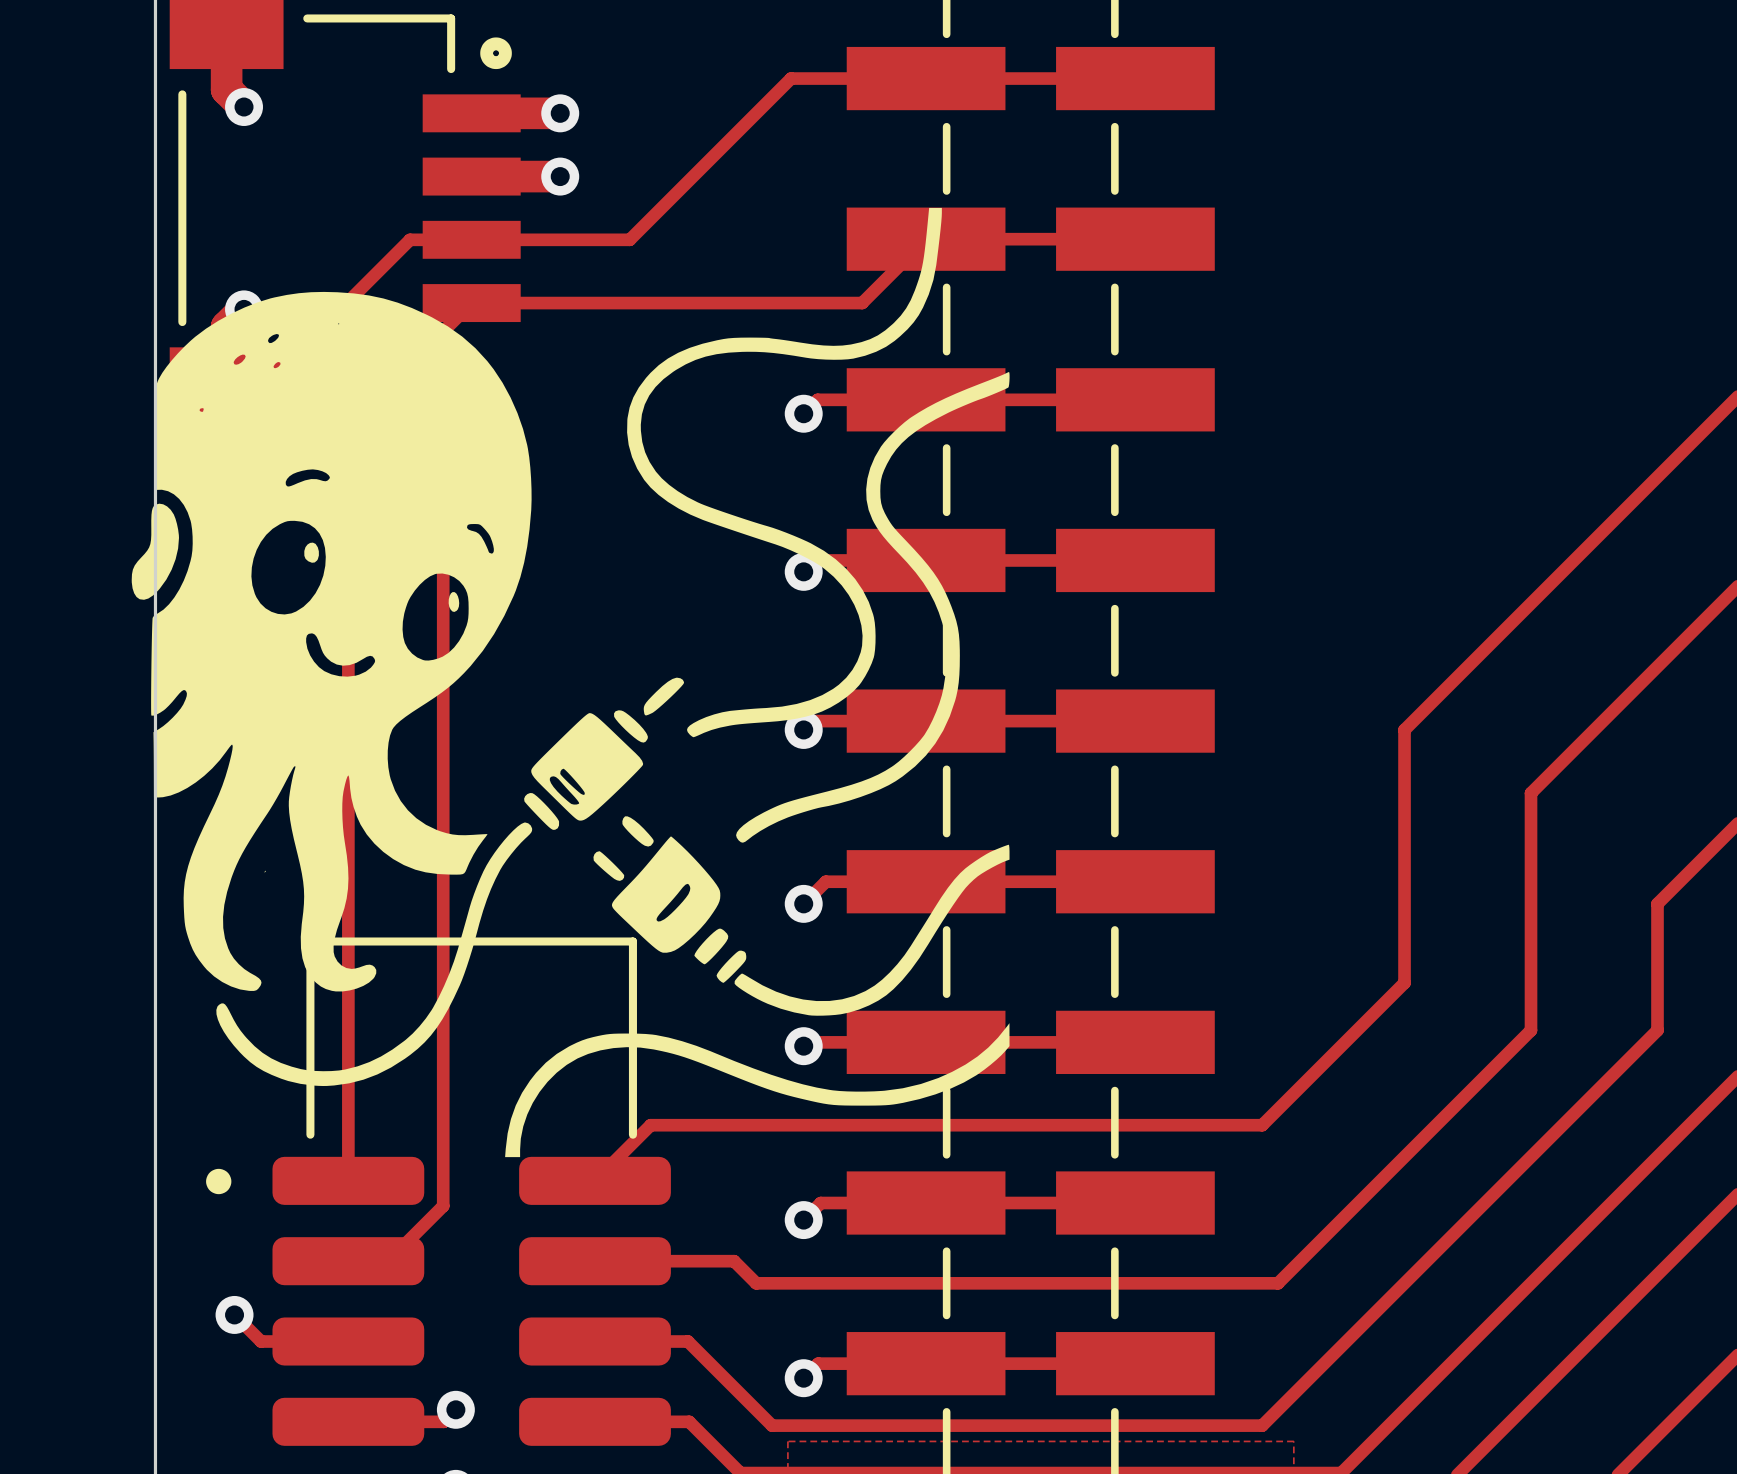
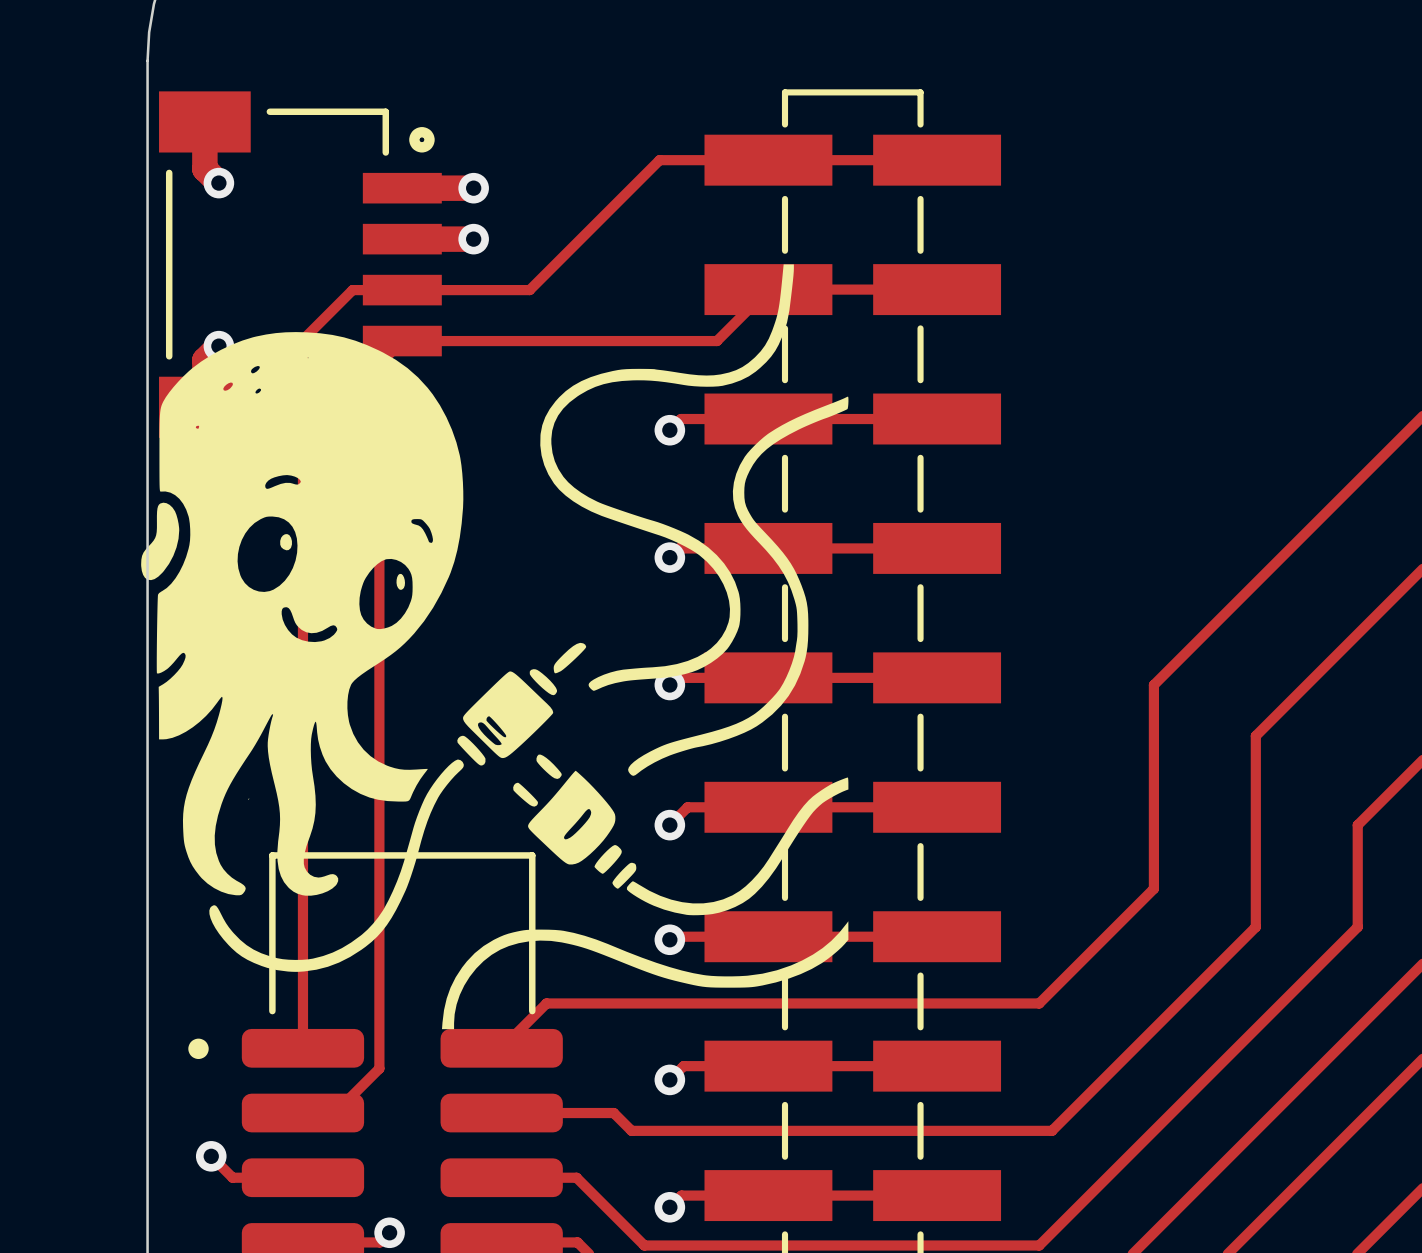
drawing position: (570, 682) -> (494, 646)

